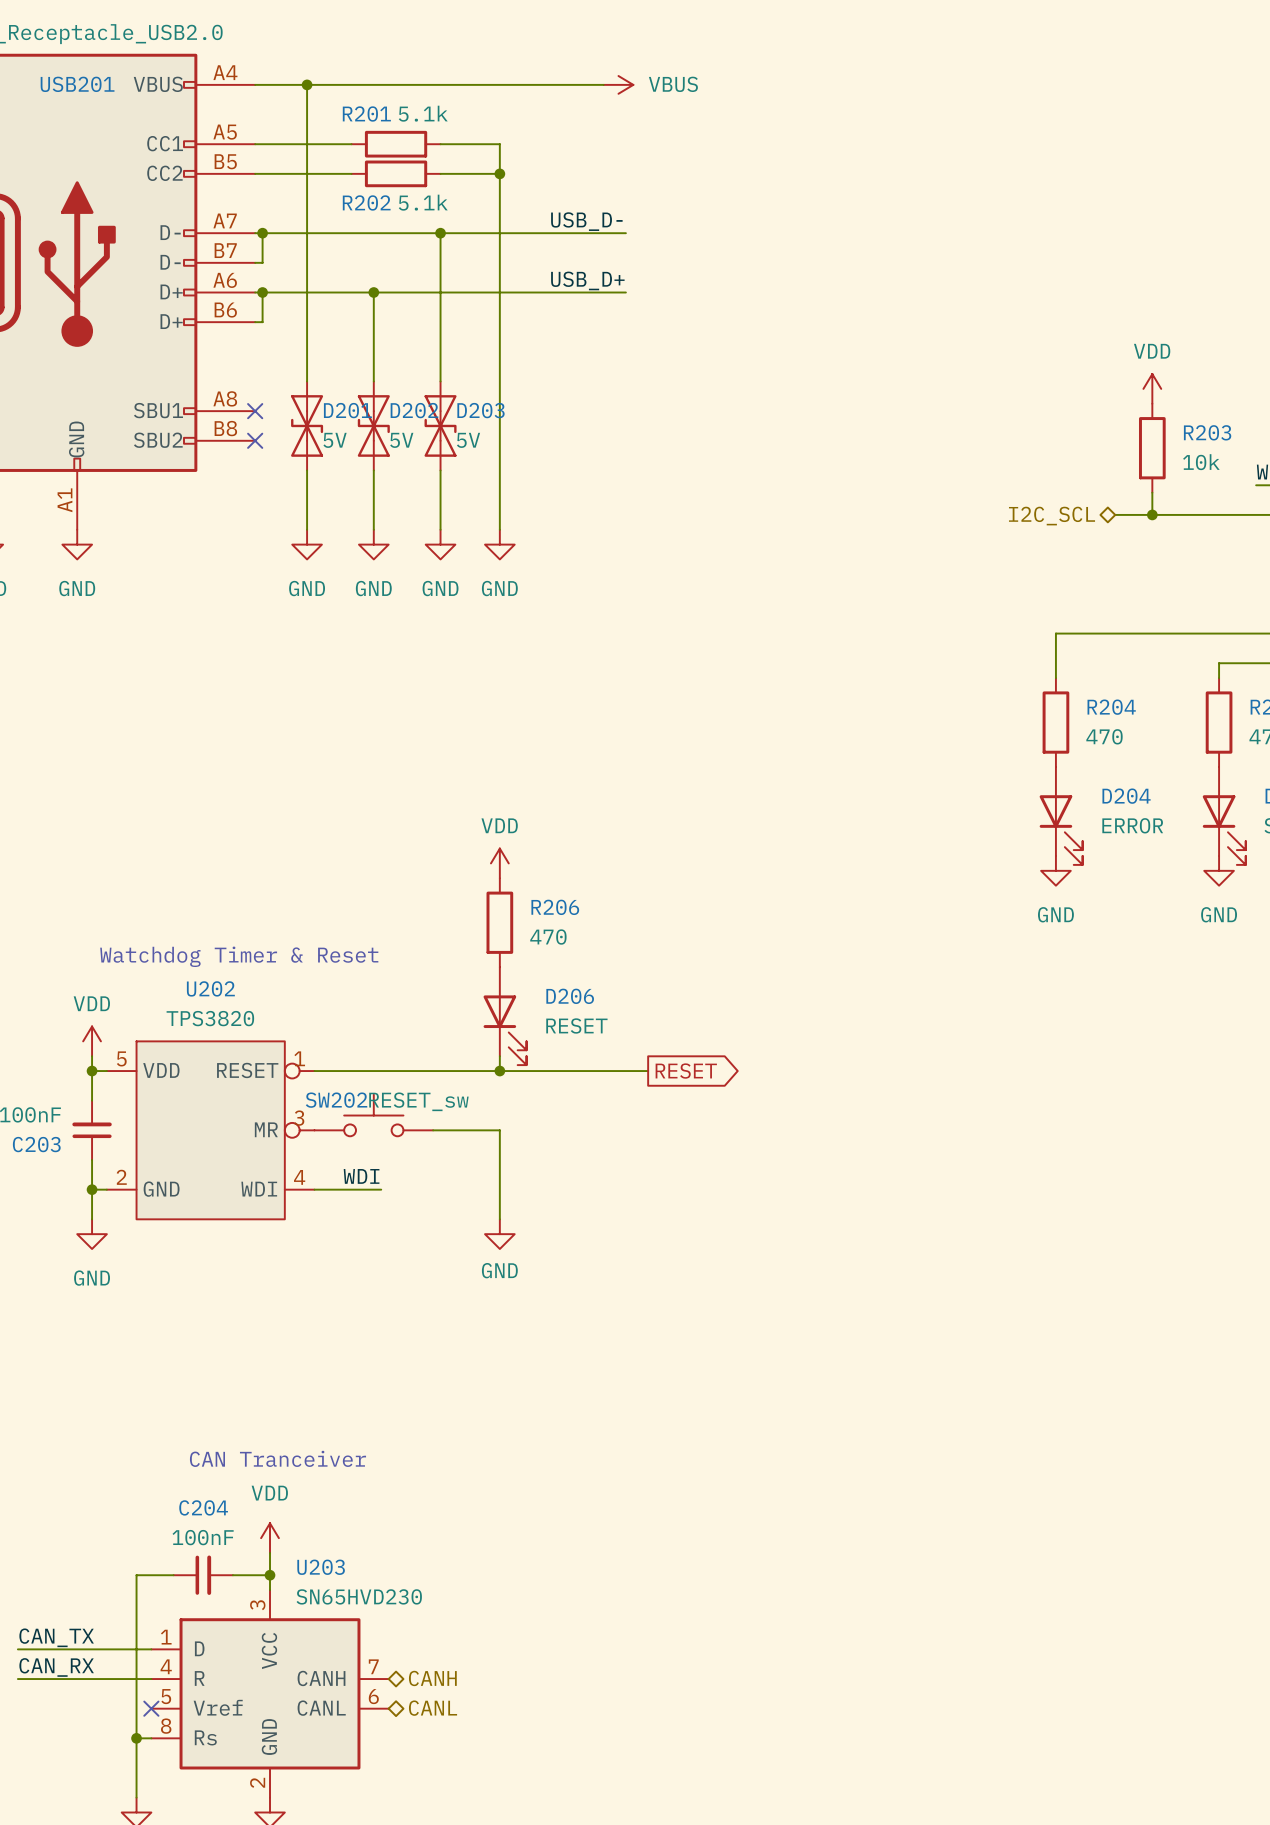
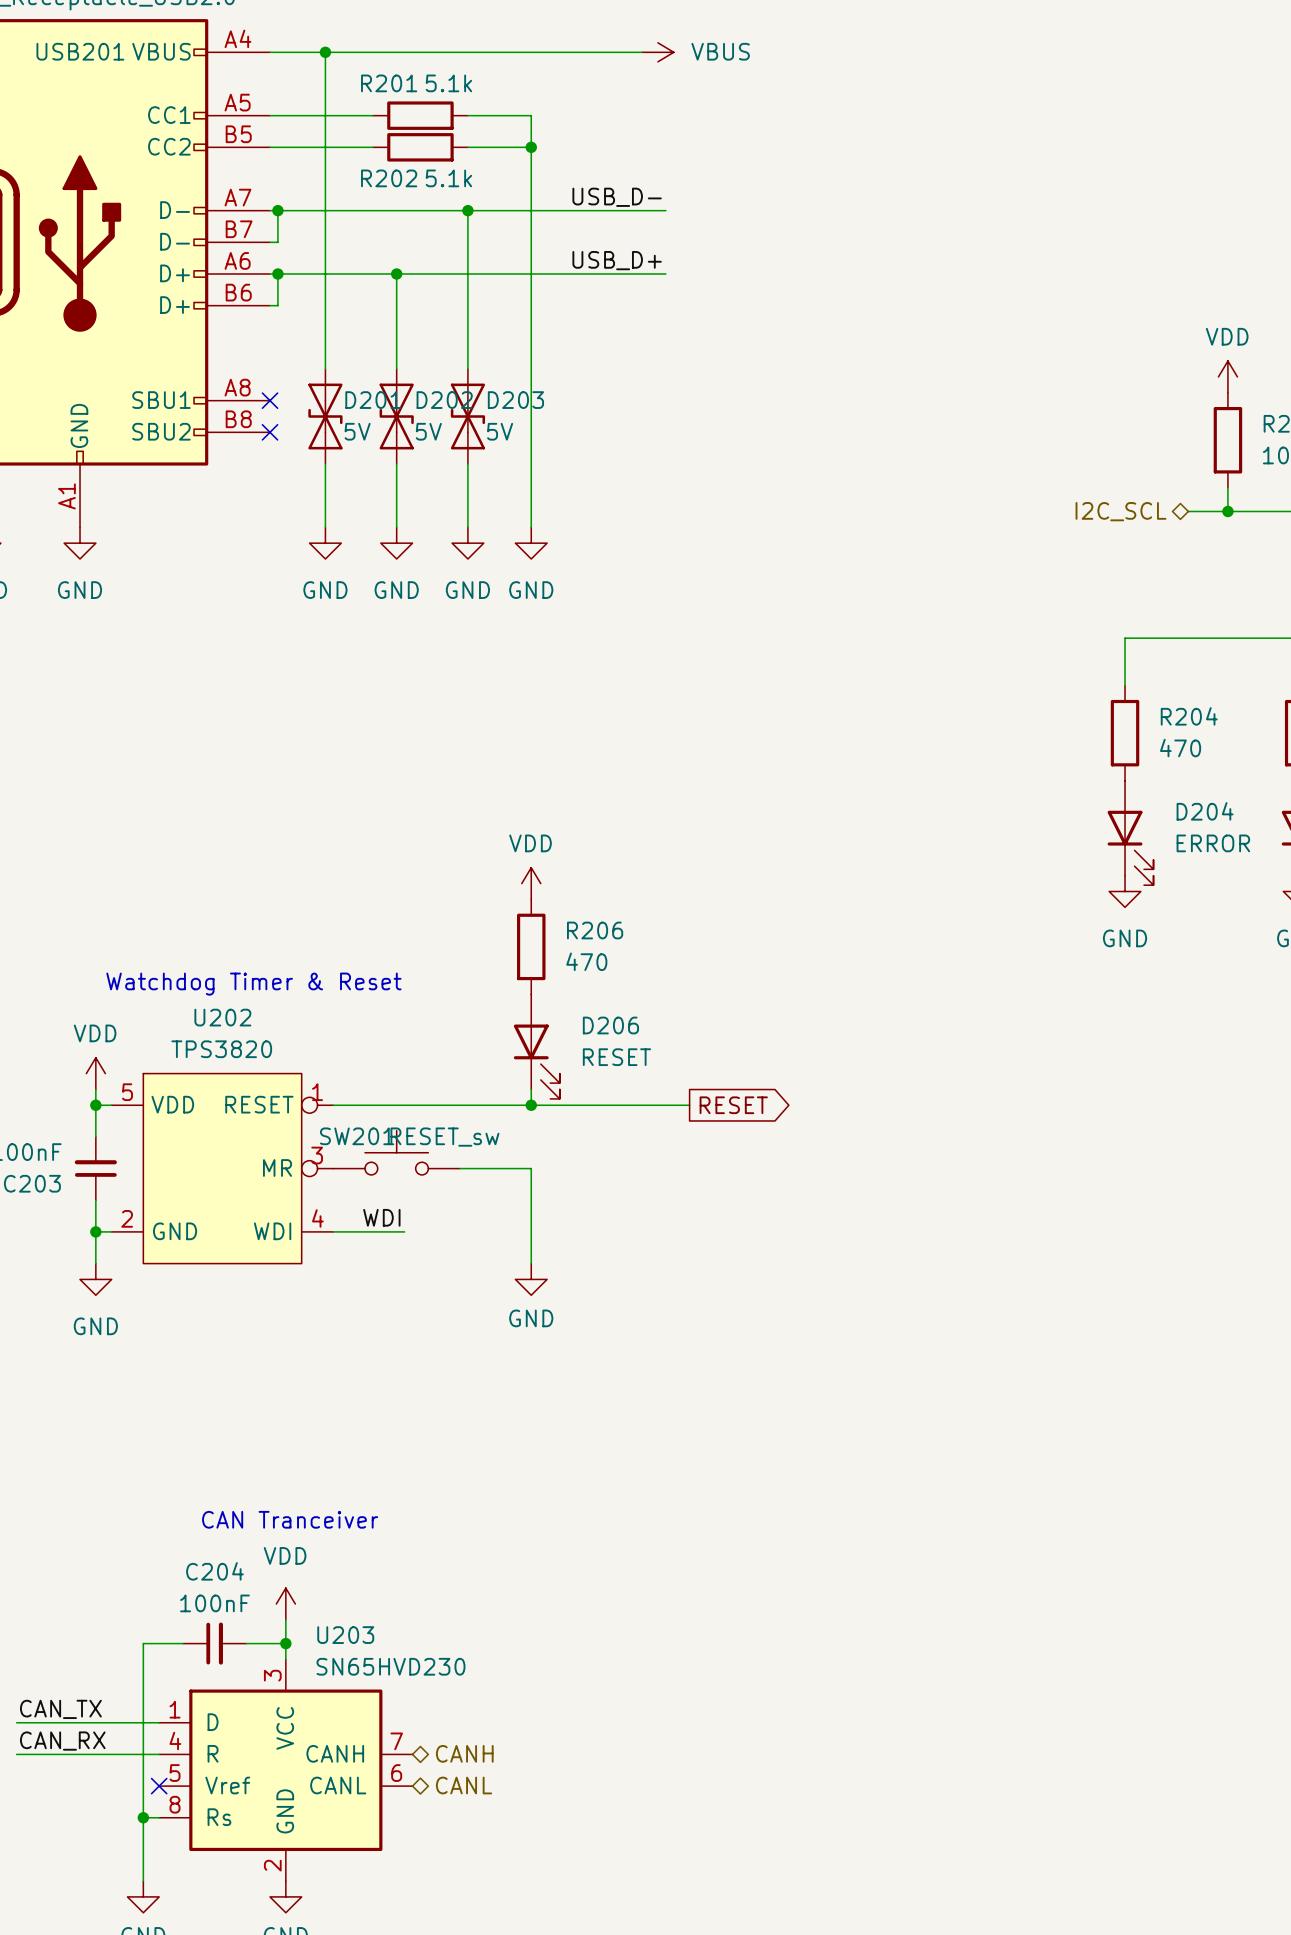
SW202 name: SW202 (336, 1100) -> SW201 (357, 1136)

